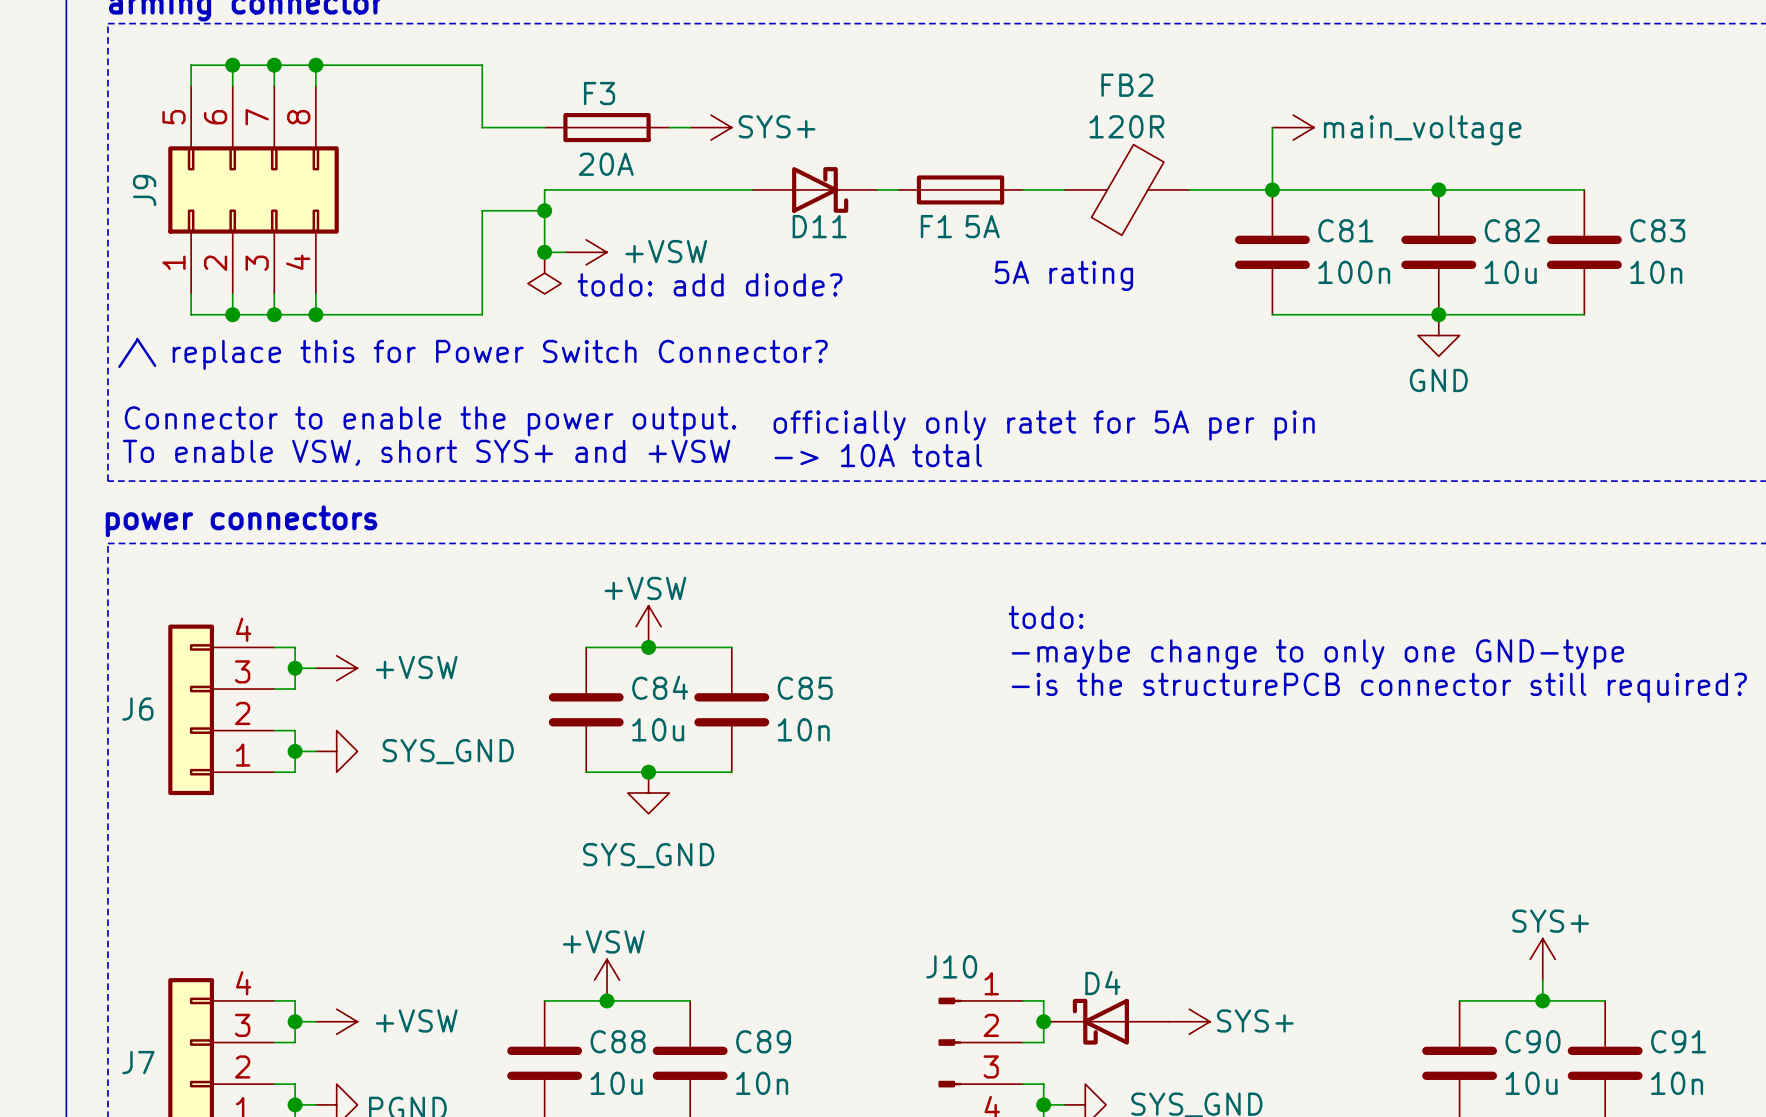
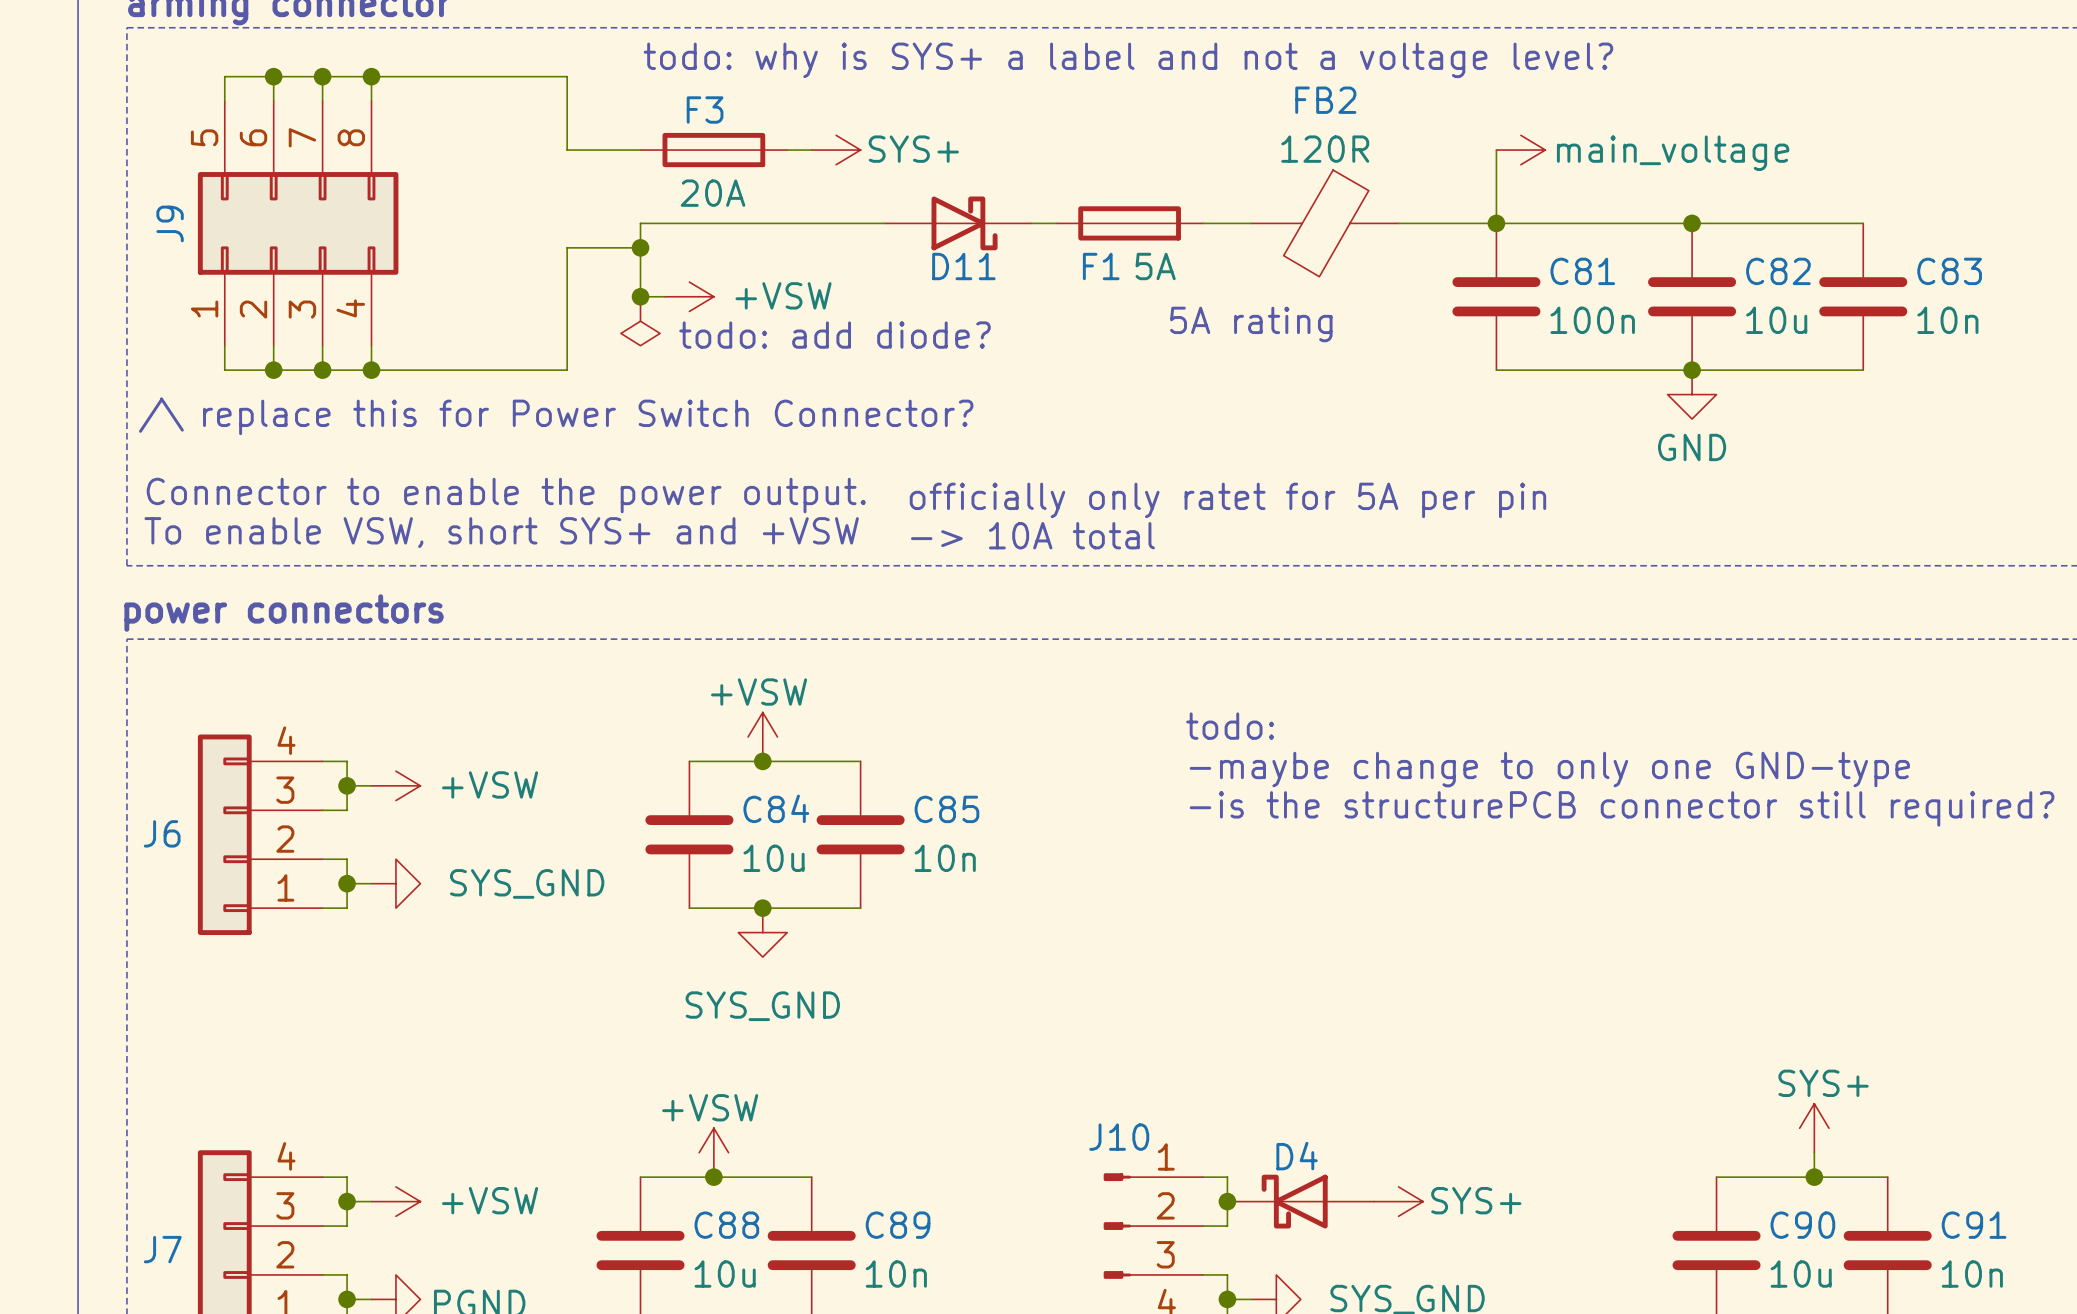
text: none -> todo: why is SYS+ a label and not a voltage level? (1128, 60)

